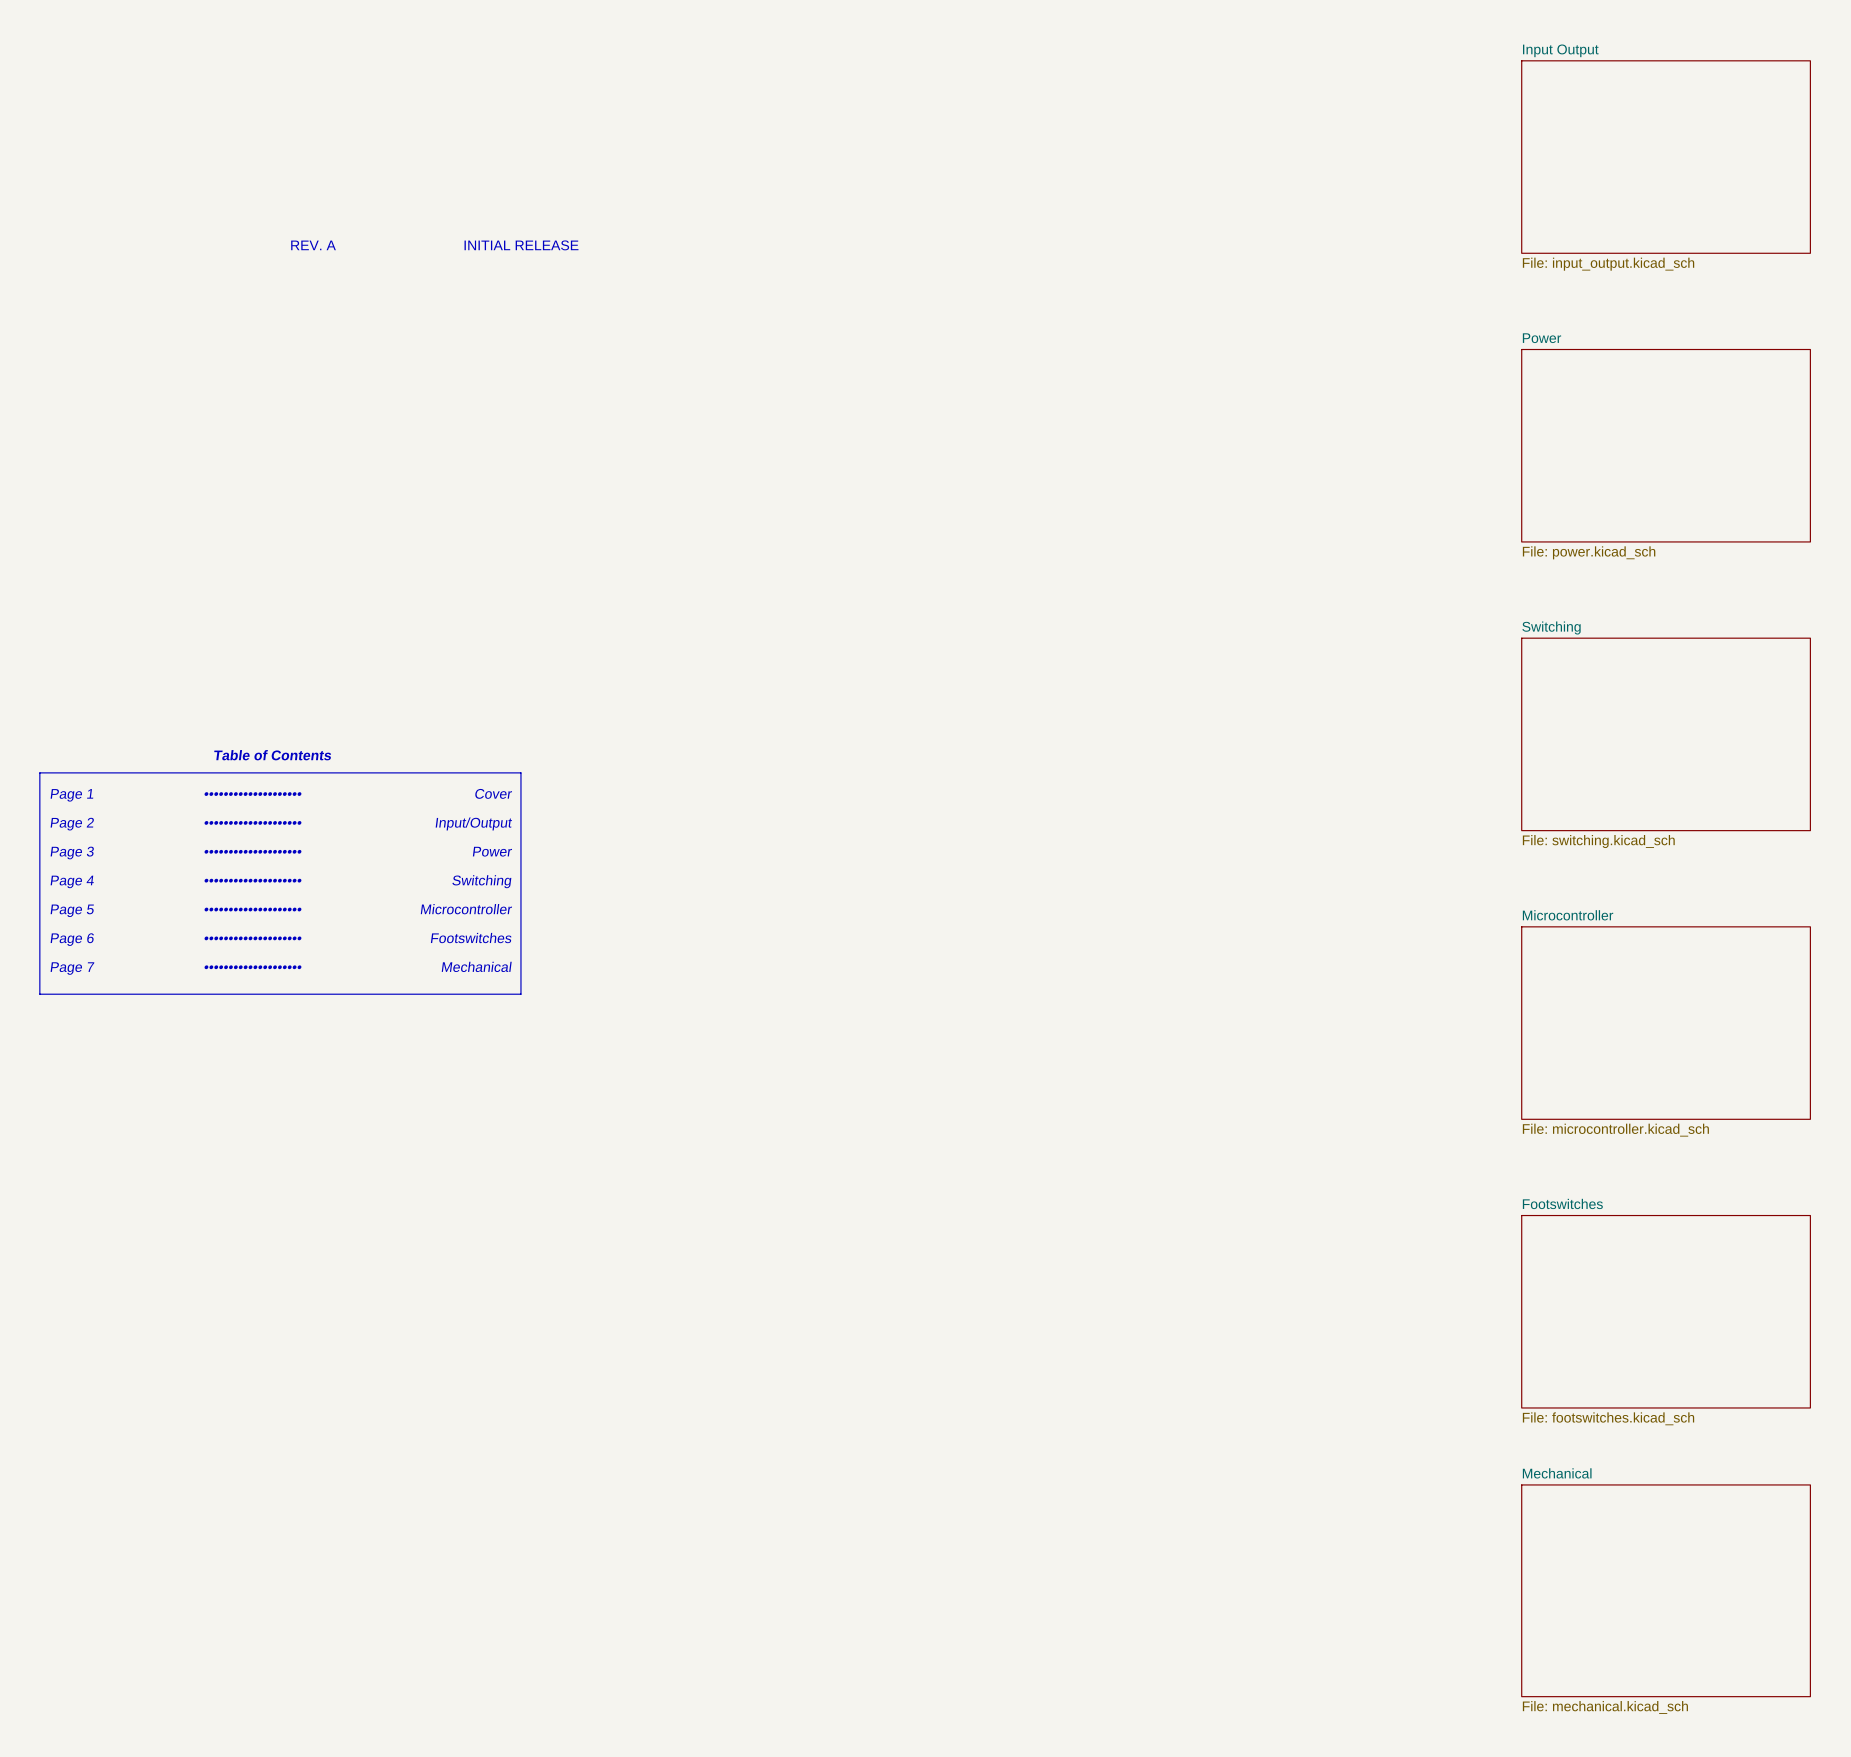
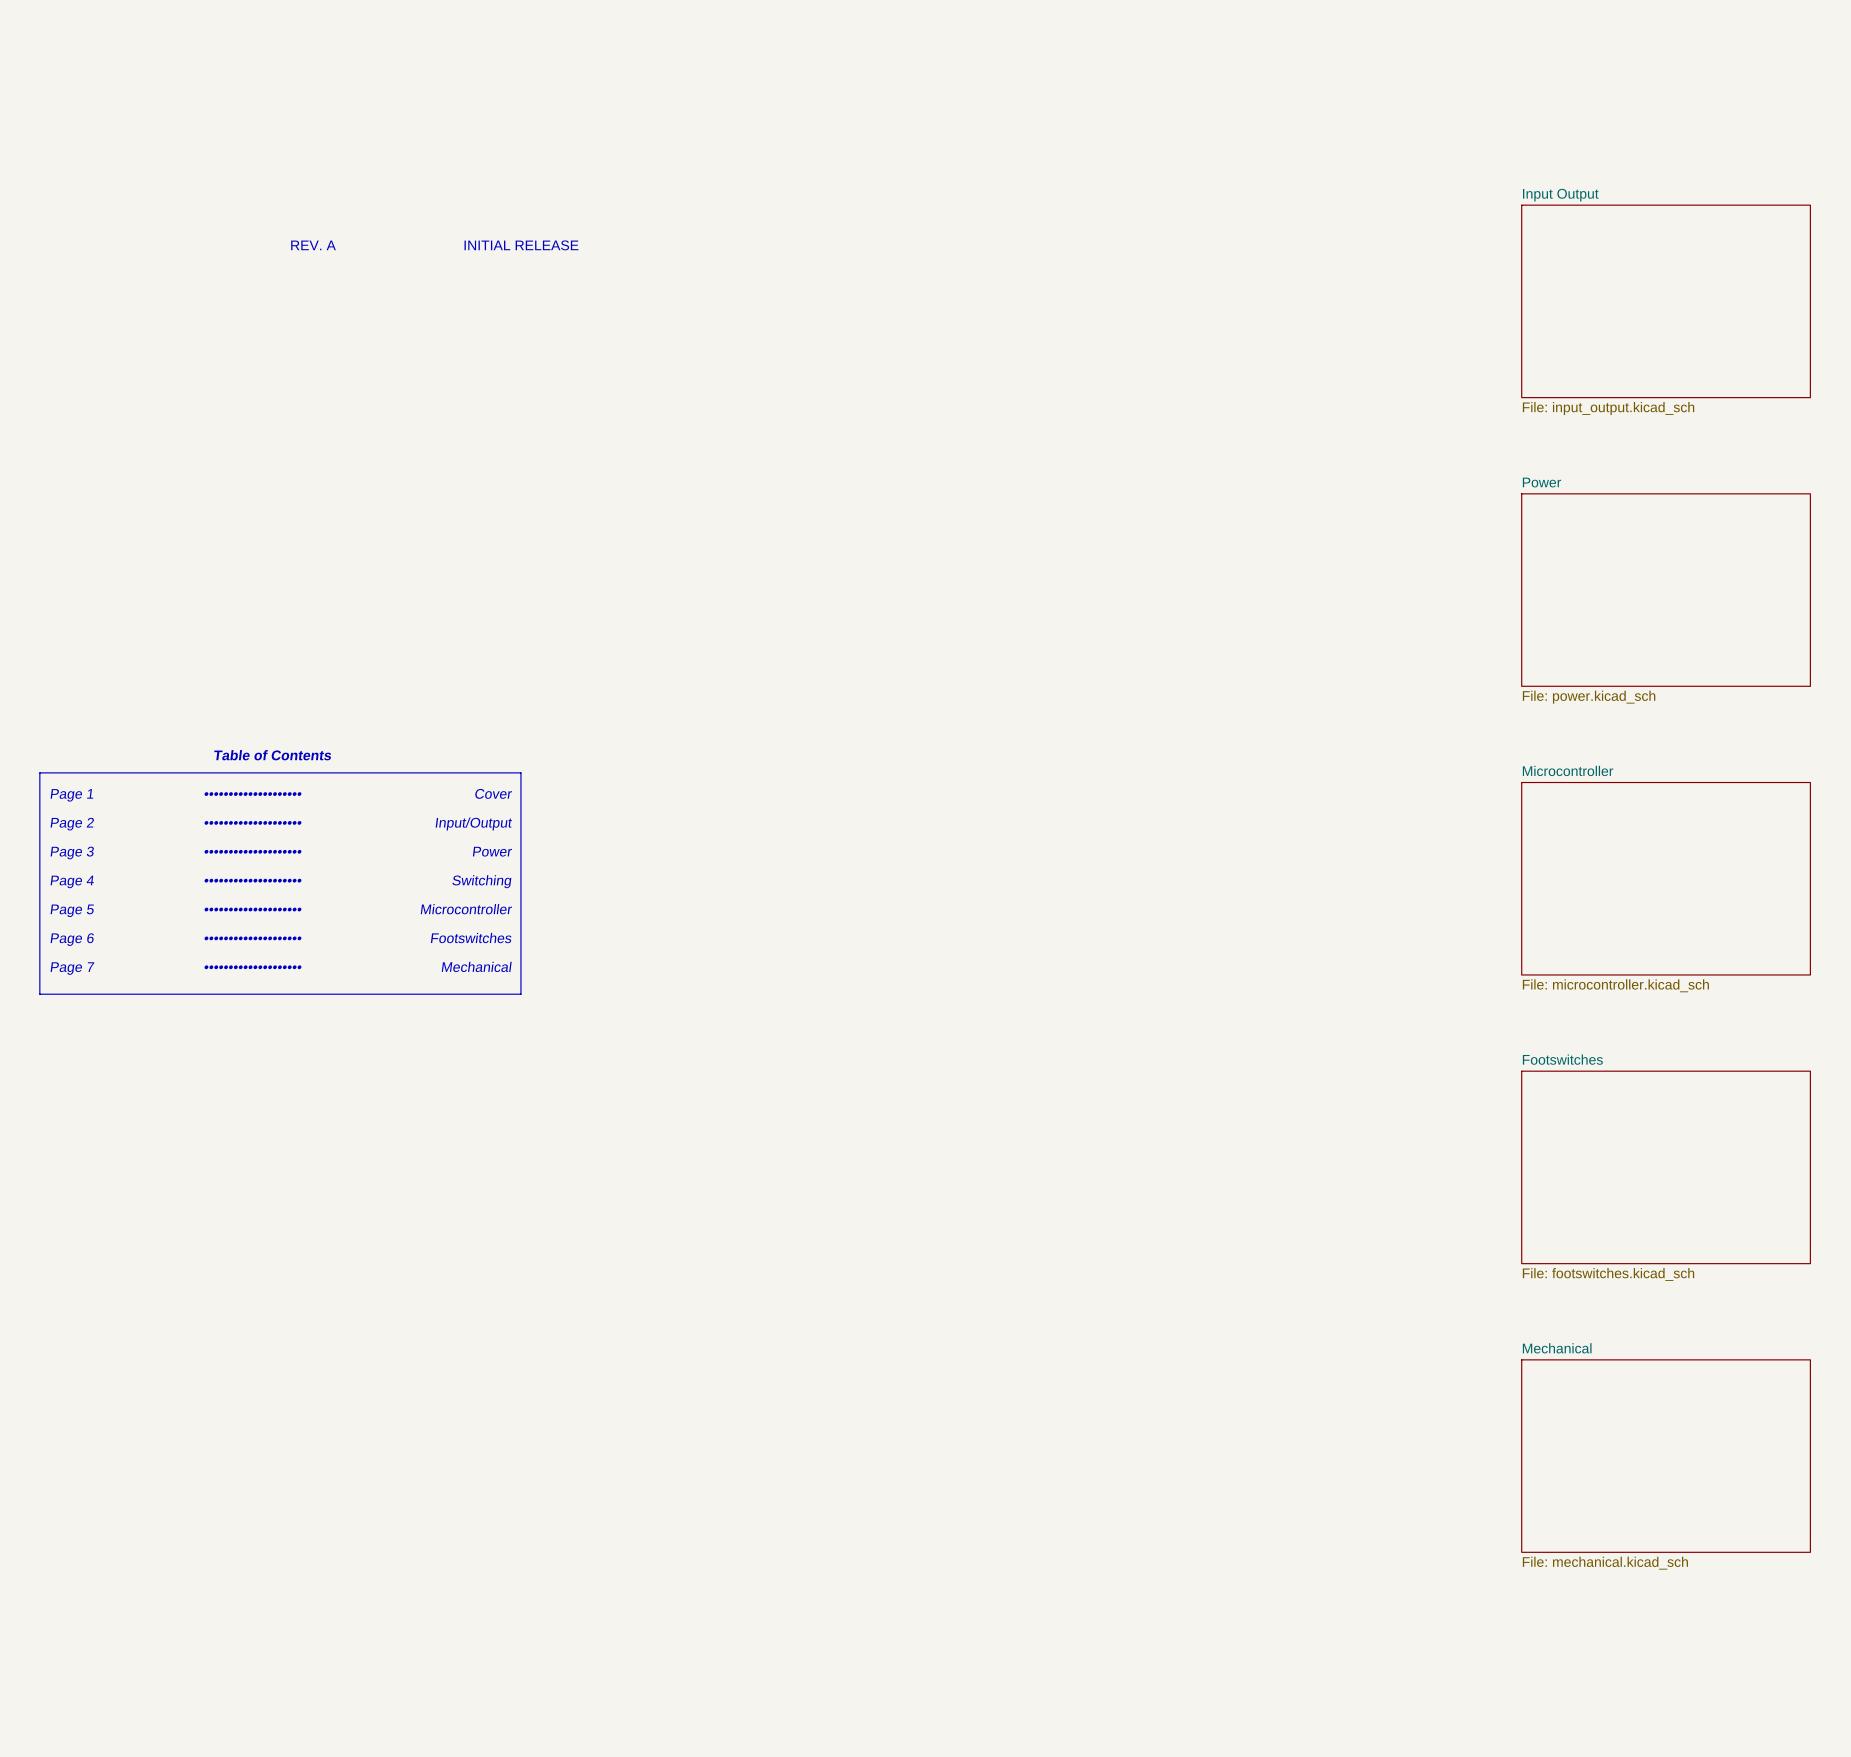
sheet Input Output position: (1666, 157) -> (1666, 301)
sheet Power position: (1666, 445) -> (1666, 590)
sheet Switching: File: switching.kicad_sch (1666, 734) -> none
sheet Microcontroller position: (1666, 1023) -> (1666, 878)
sheet Footswitches position: (1666, 1311) -> (1666, 1167)
sheet Mechanical: none -> File: mechanical.kicad_sch (1666, 1456)
sheet Mechanical: File: mechanical.kicad_sch (1666, 1590) -> none

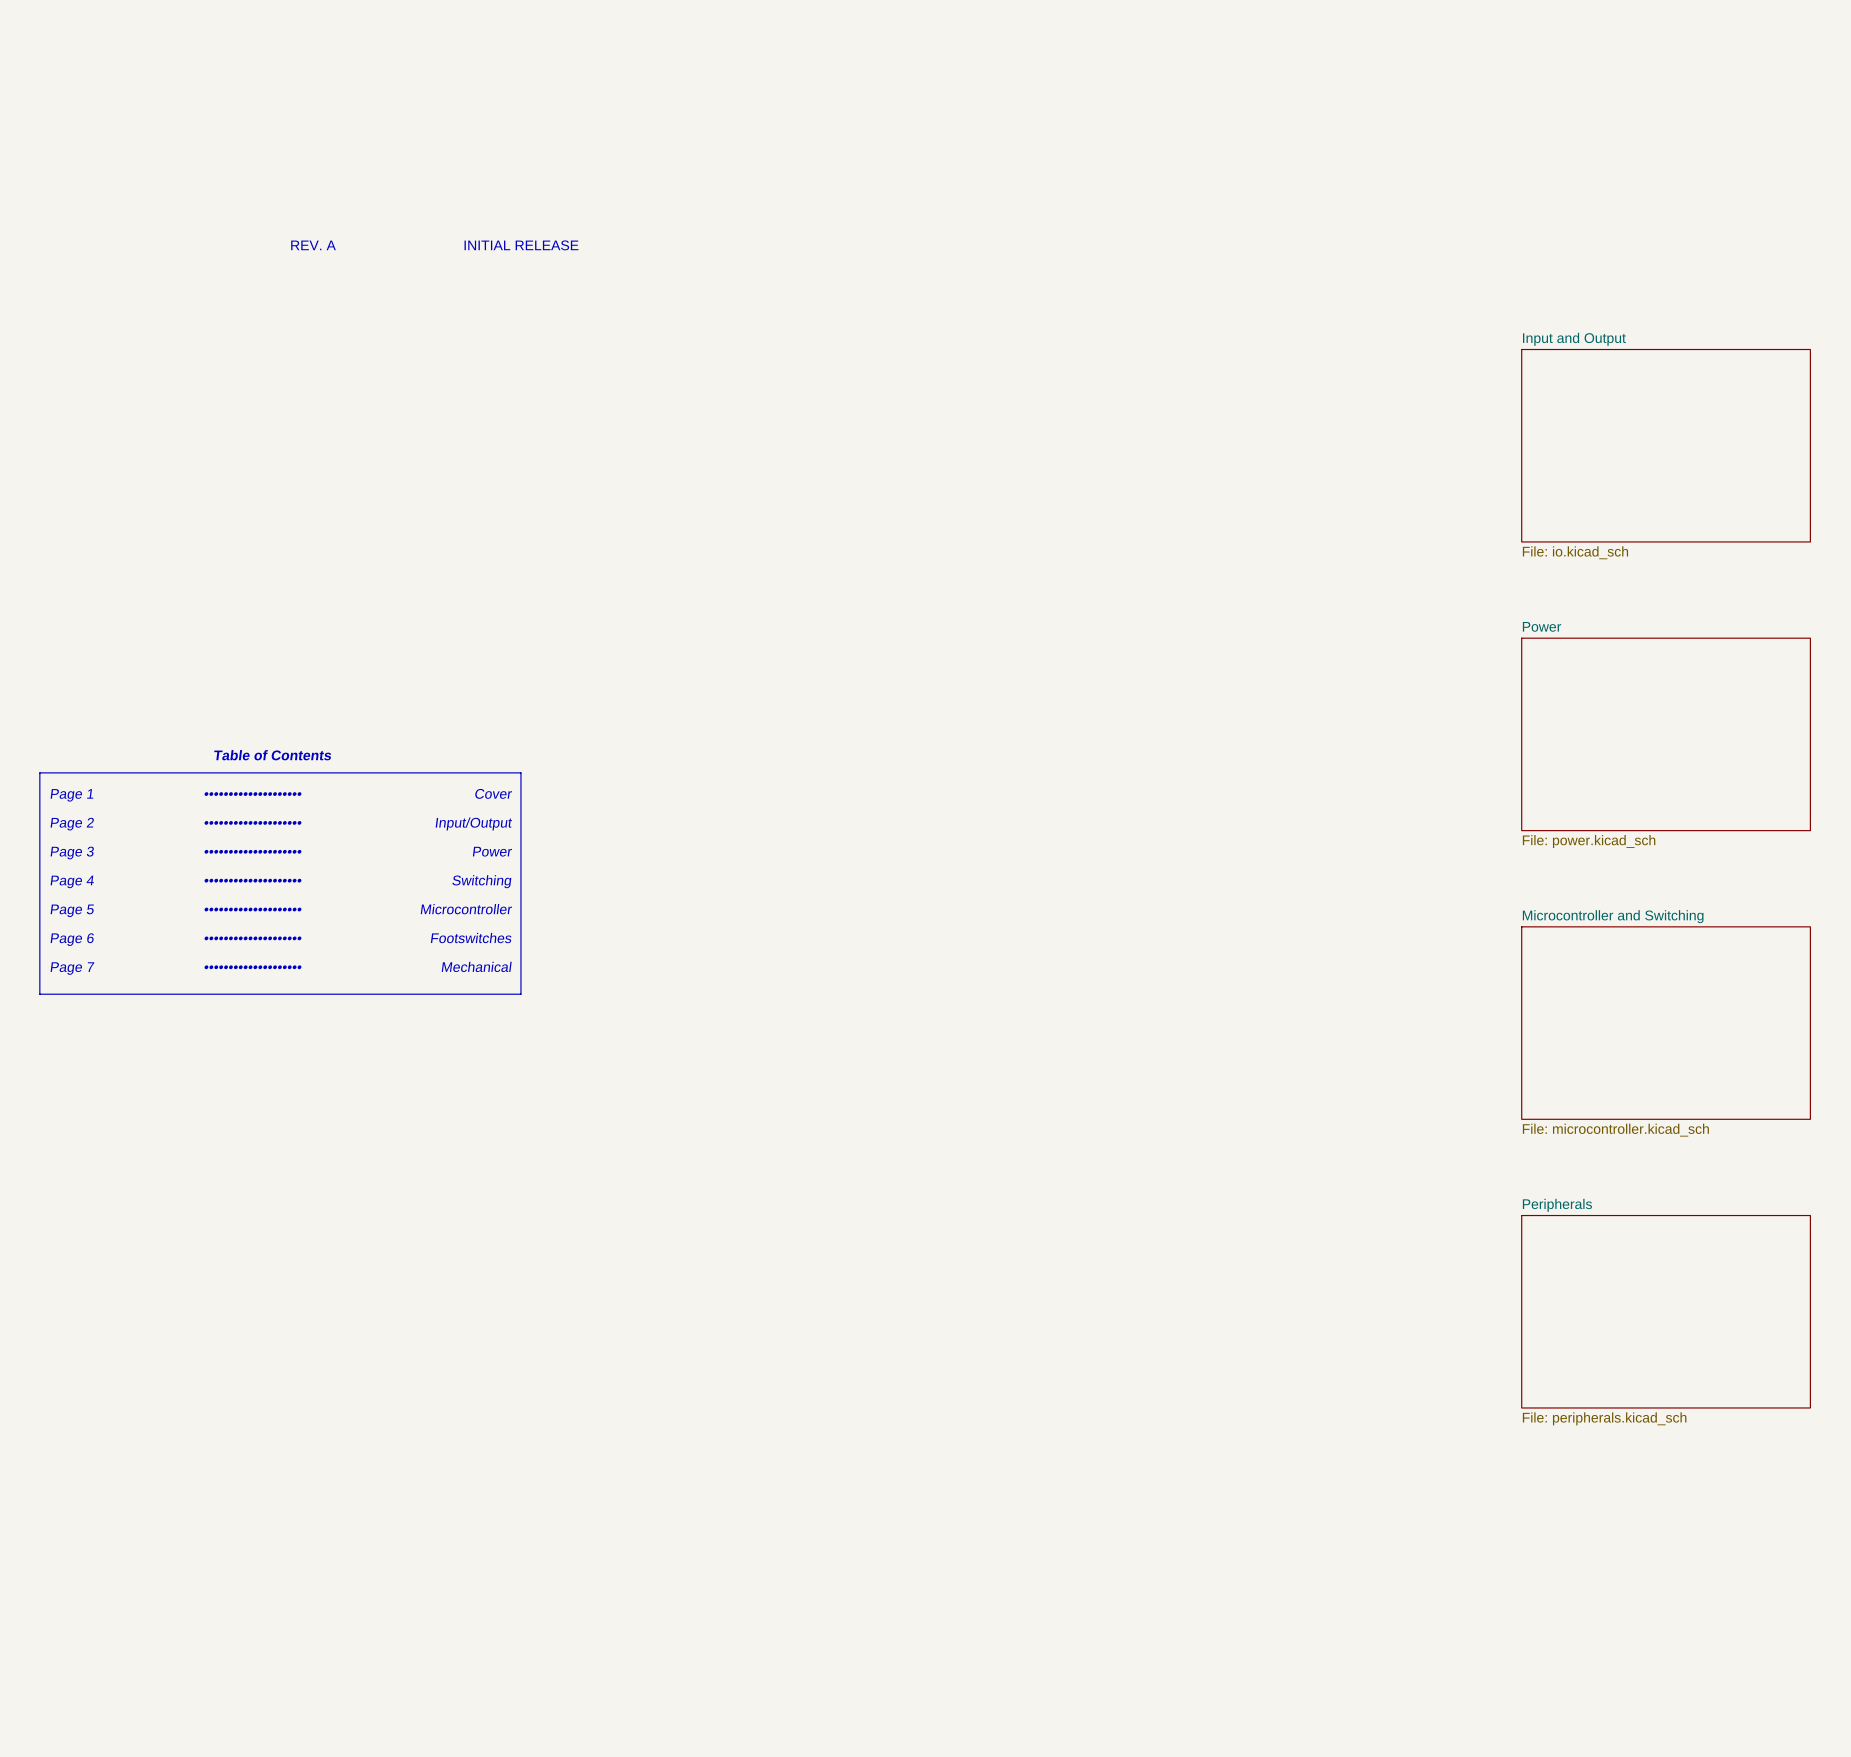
sheet Input Output: File: input_output.kicad_sch (1666, 301) -> none
sheet Input and Output: none -> File: io.kicad_sch (1666, 445)
sheet Power position: (1666, 590) -> (1666, 734)
sheet Microcontroller: File: microcontroller.kicad_sch (1666, 878) -> none
sheet Microcontroller and Switching: none -> File: microcontroller.kicad_sch (1666, 1023)
sheet Footswitches: File: footswitches.kicad_sch (1666, 1167) -> none
sheet Peripherals: none -> File: peripherals.kicad_sch (1666, 1311)
sheet Mechanical: File: mechanical.kicad_sch (1666, 1456) -> none

